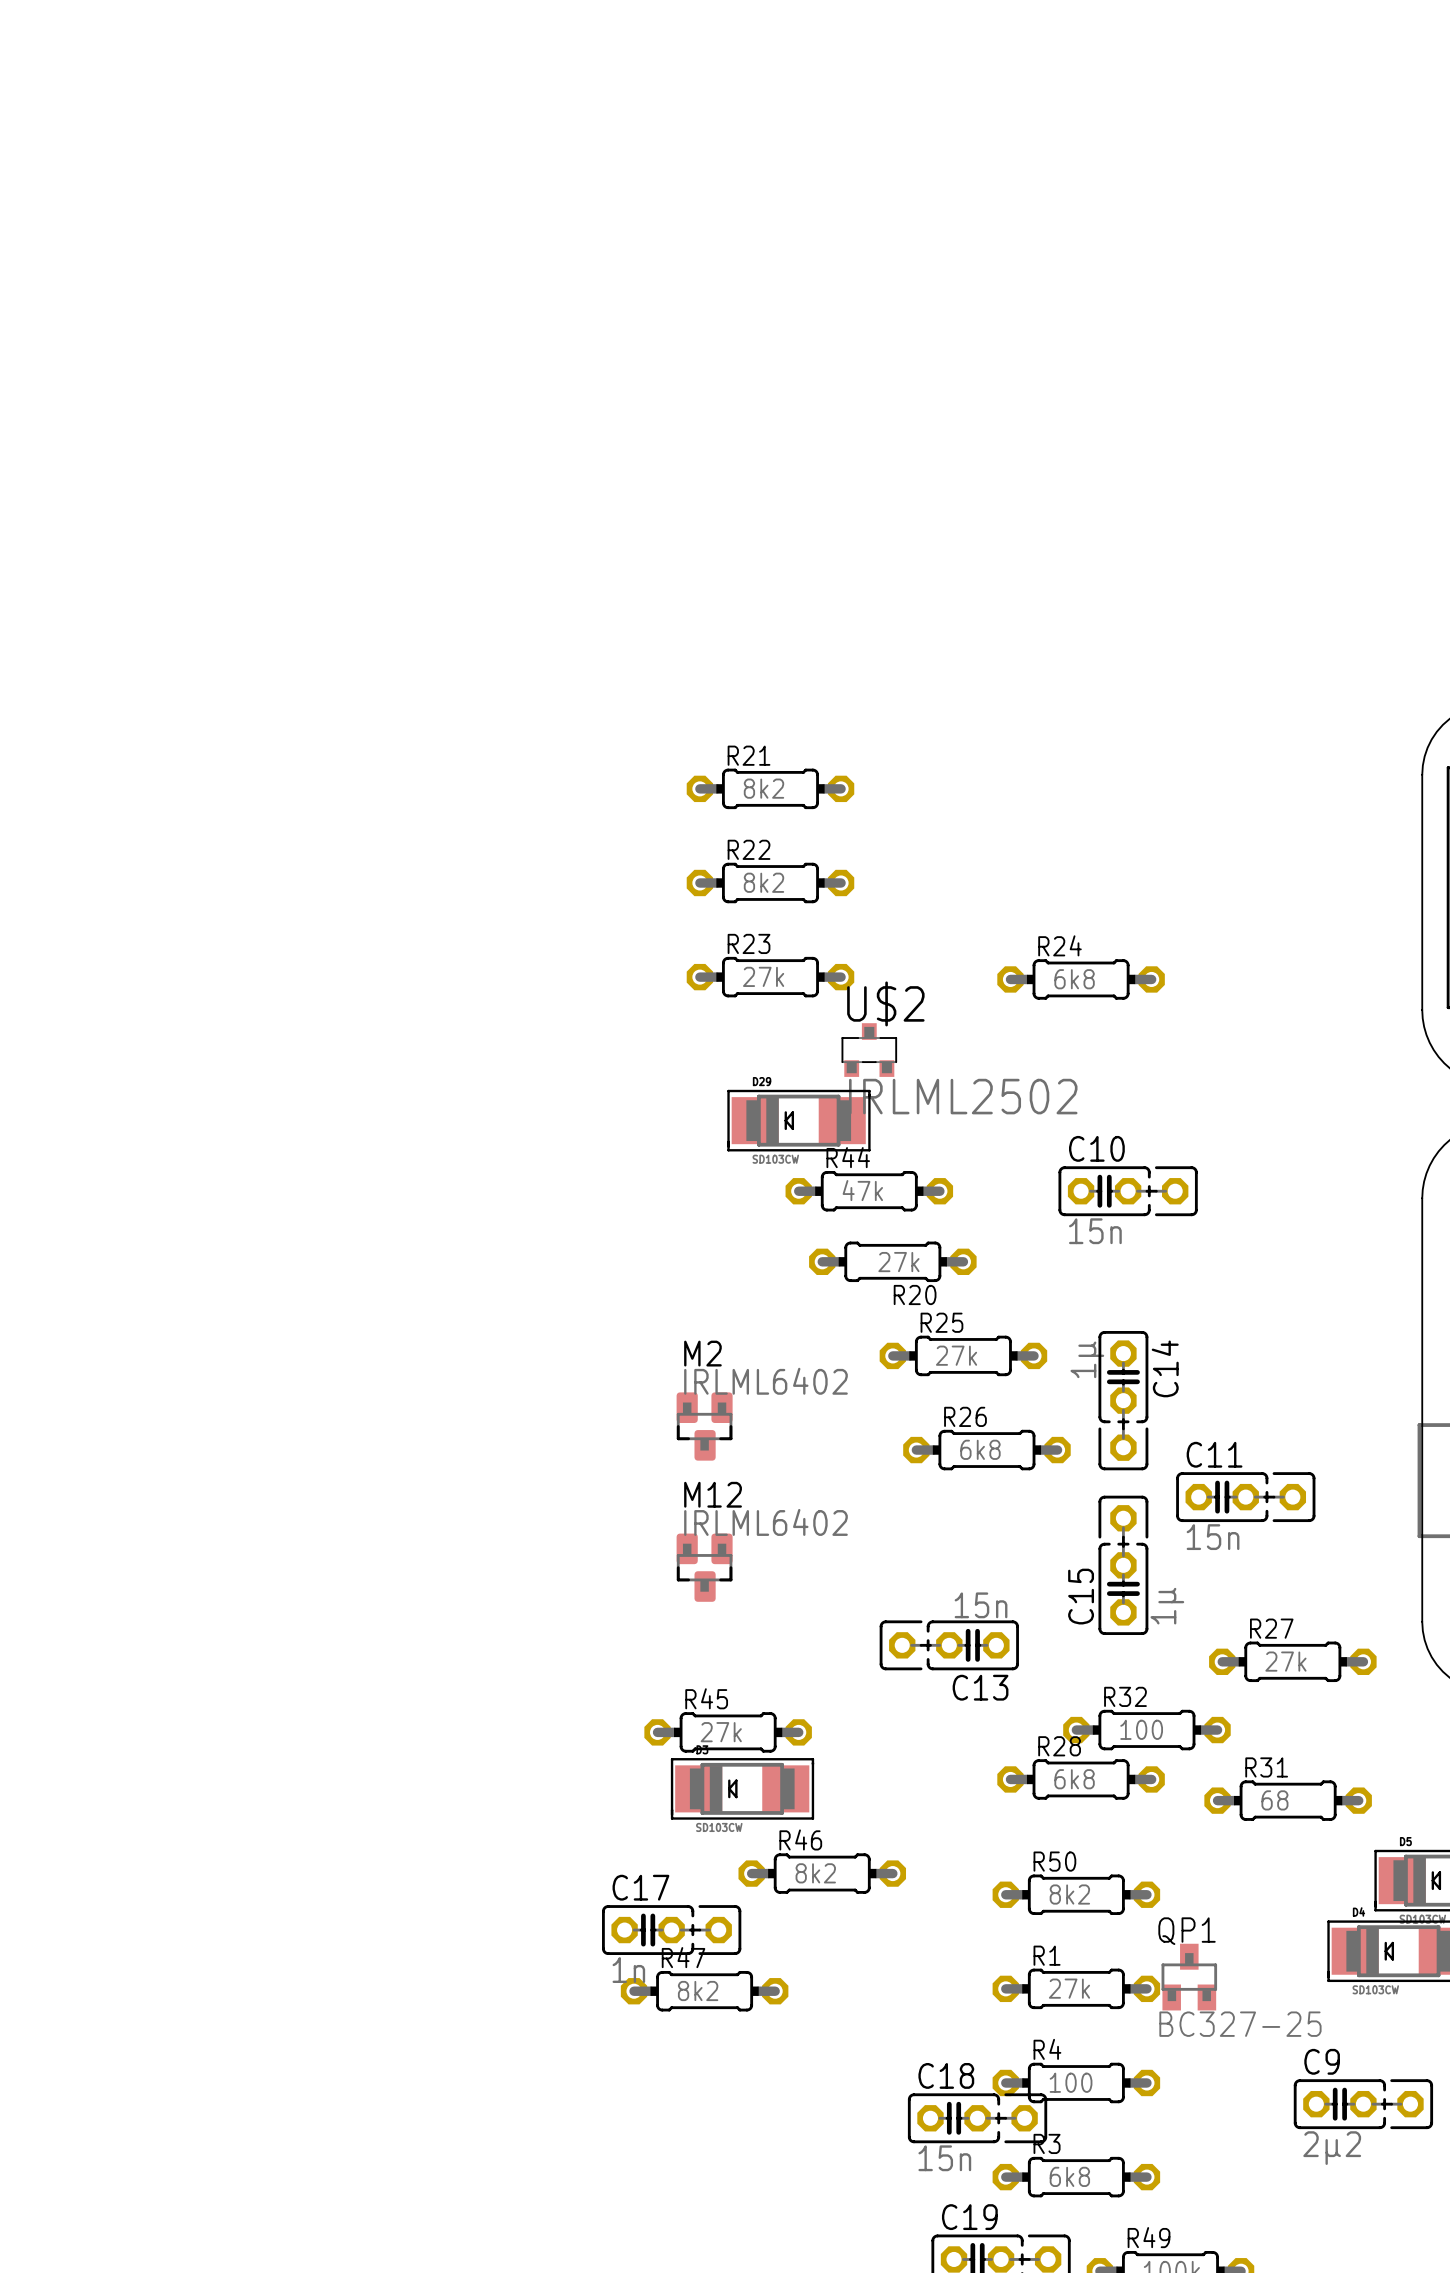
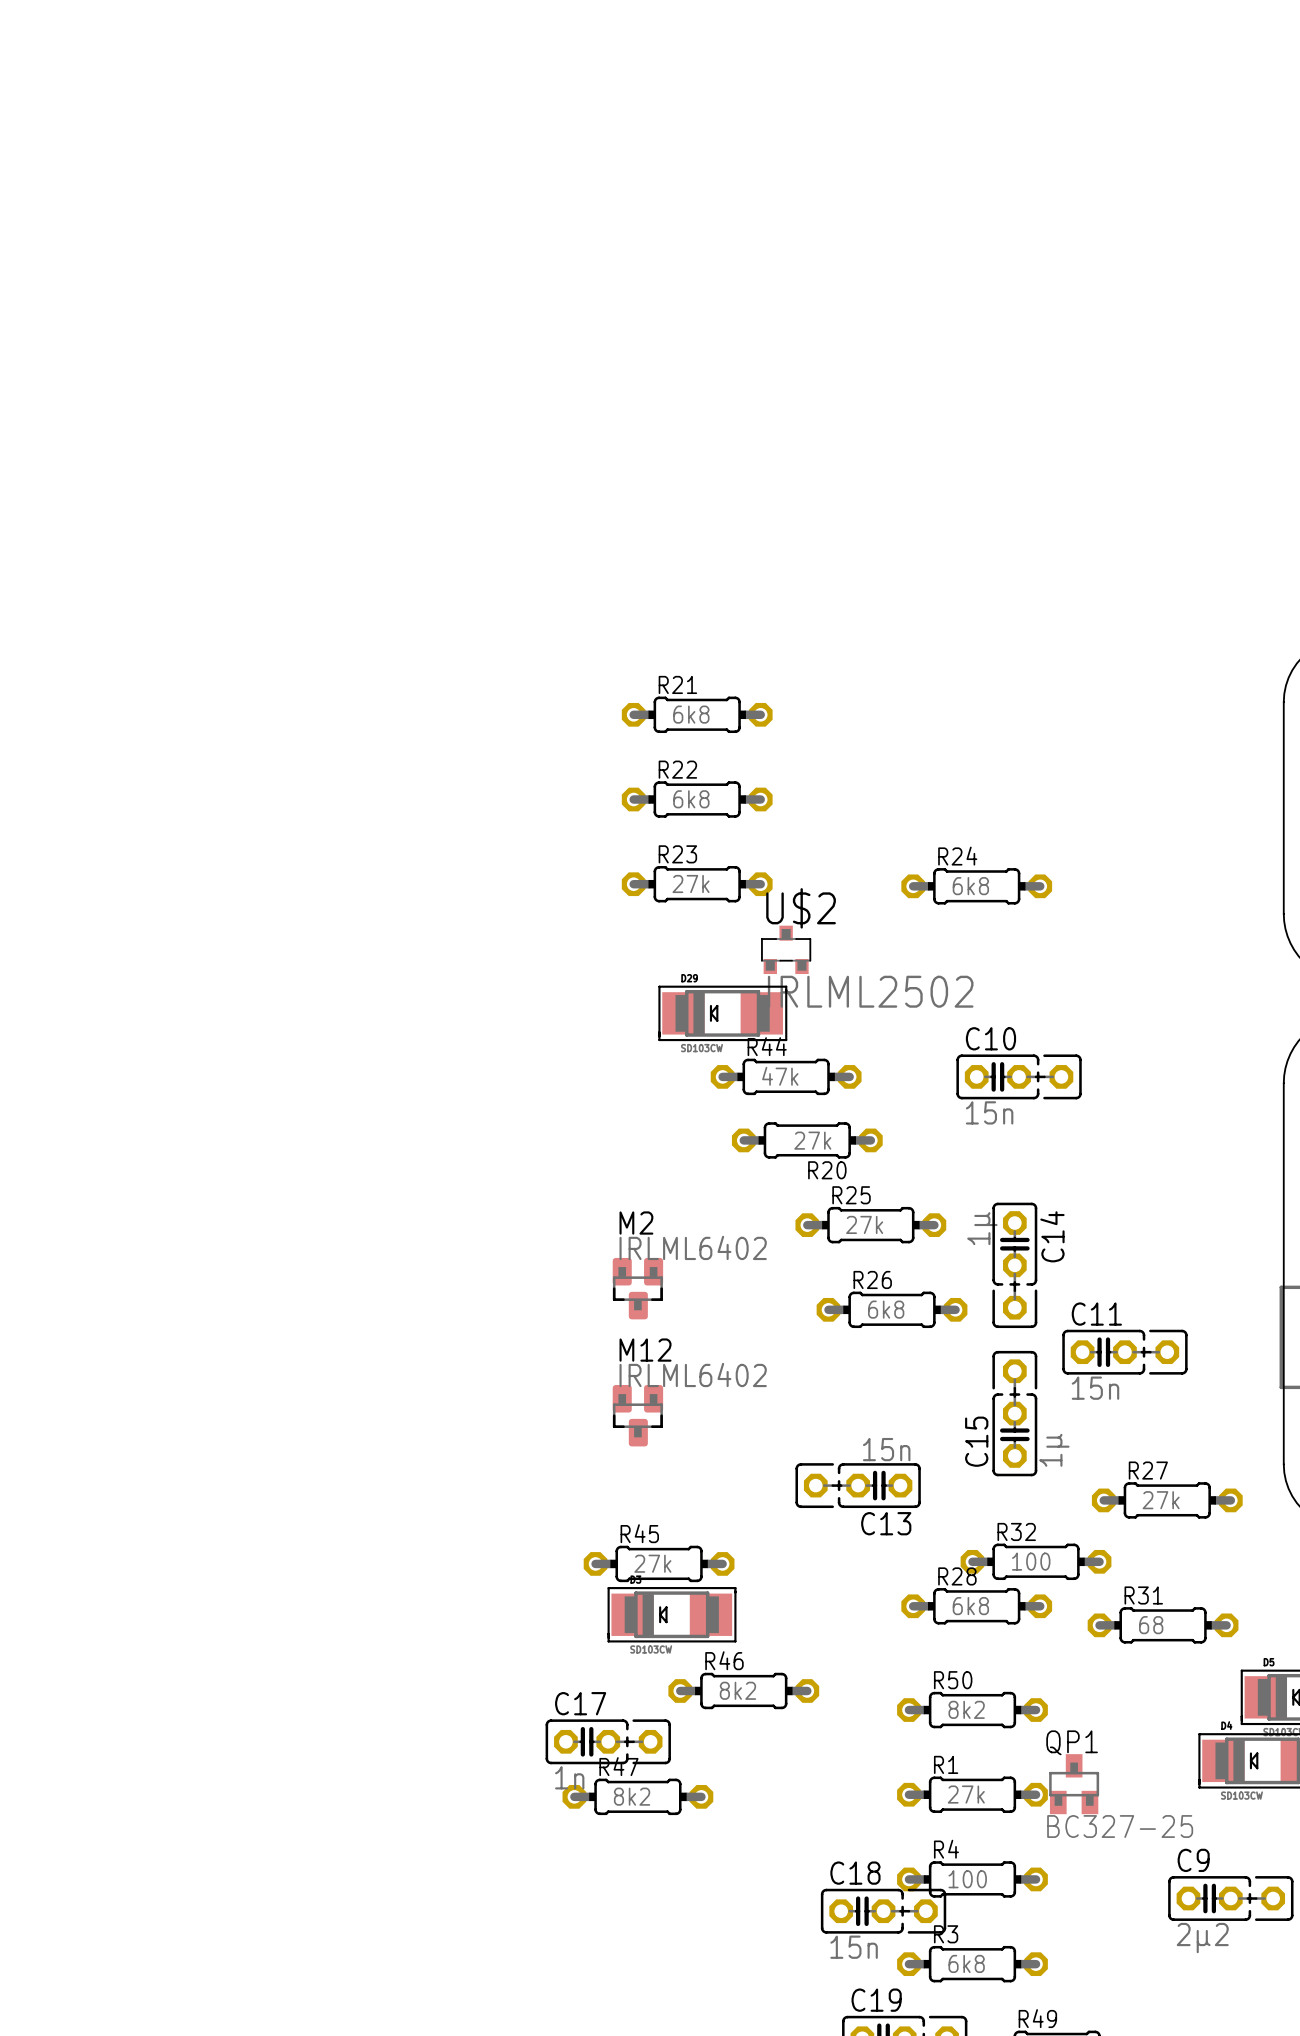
R21 value: 8k2 (763, 788) -> 6k8 (691, 714)
R22 value: 8k2 (763, 882) -> 6k8 (691, 799)

